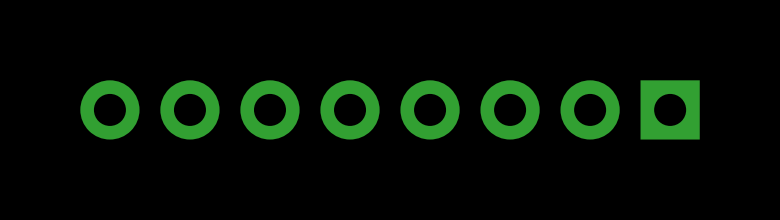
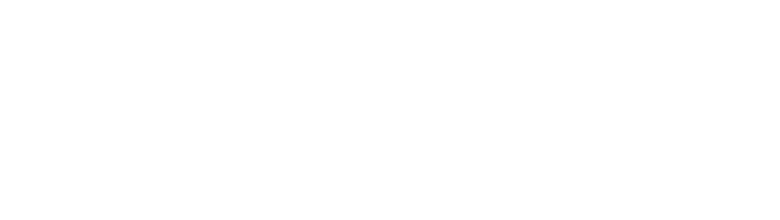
part: (390, 109) -> none

